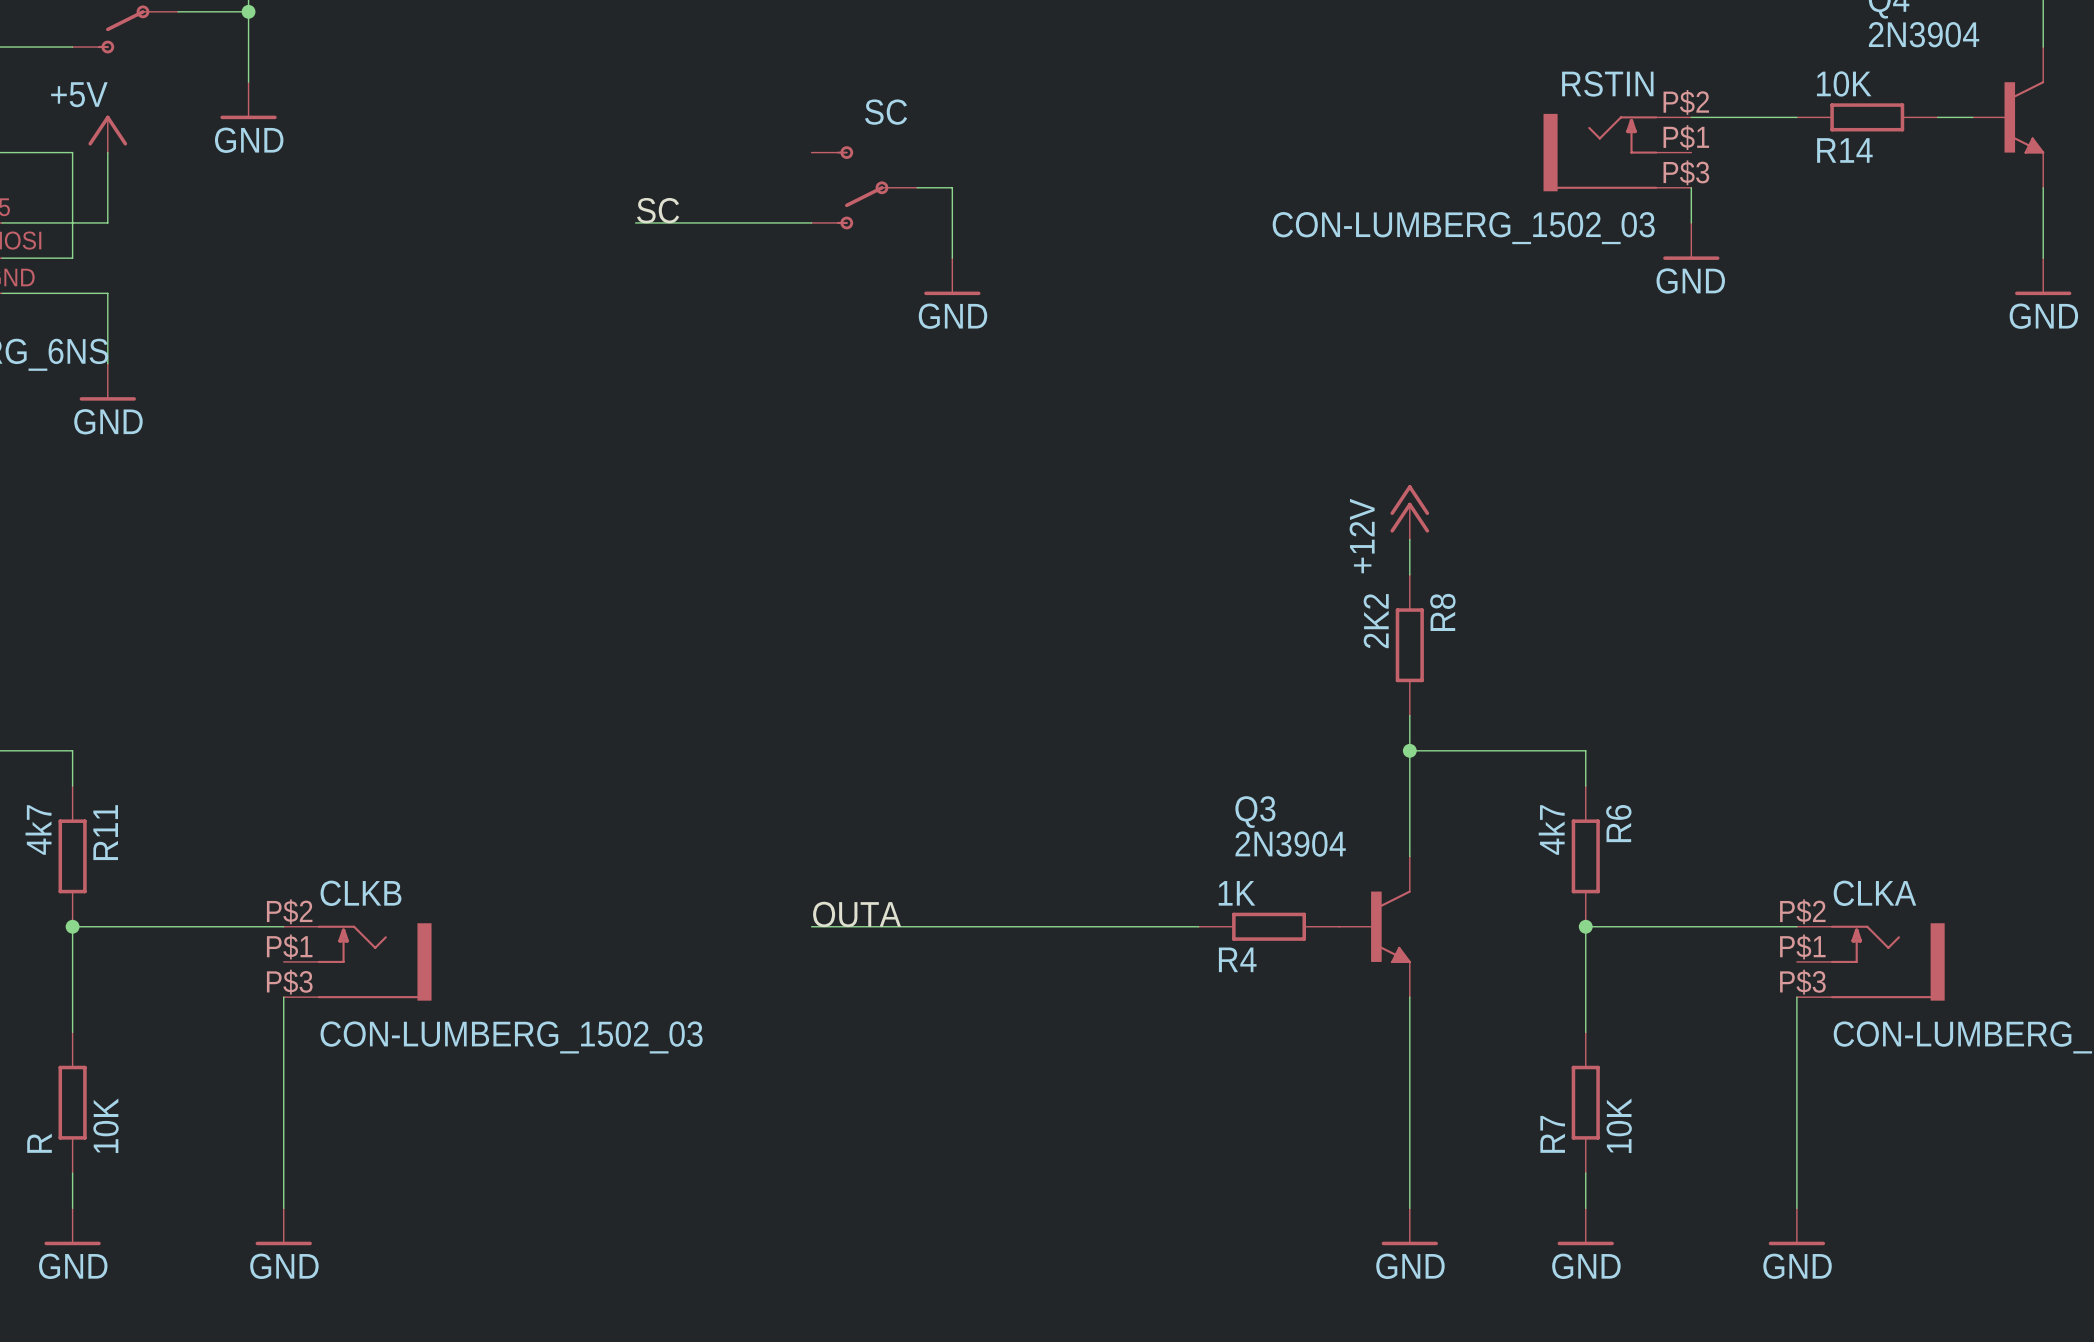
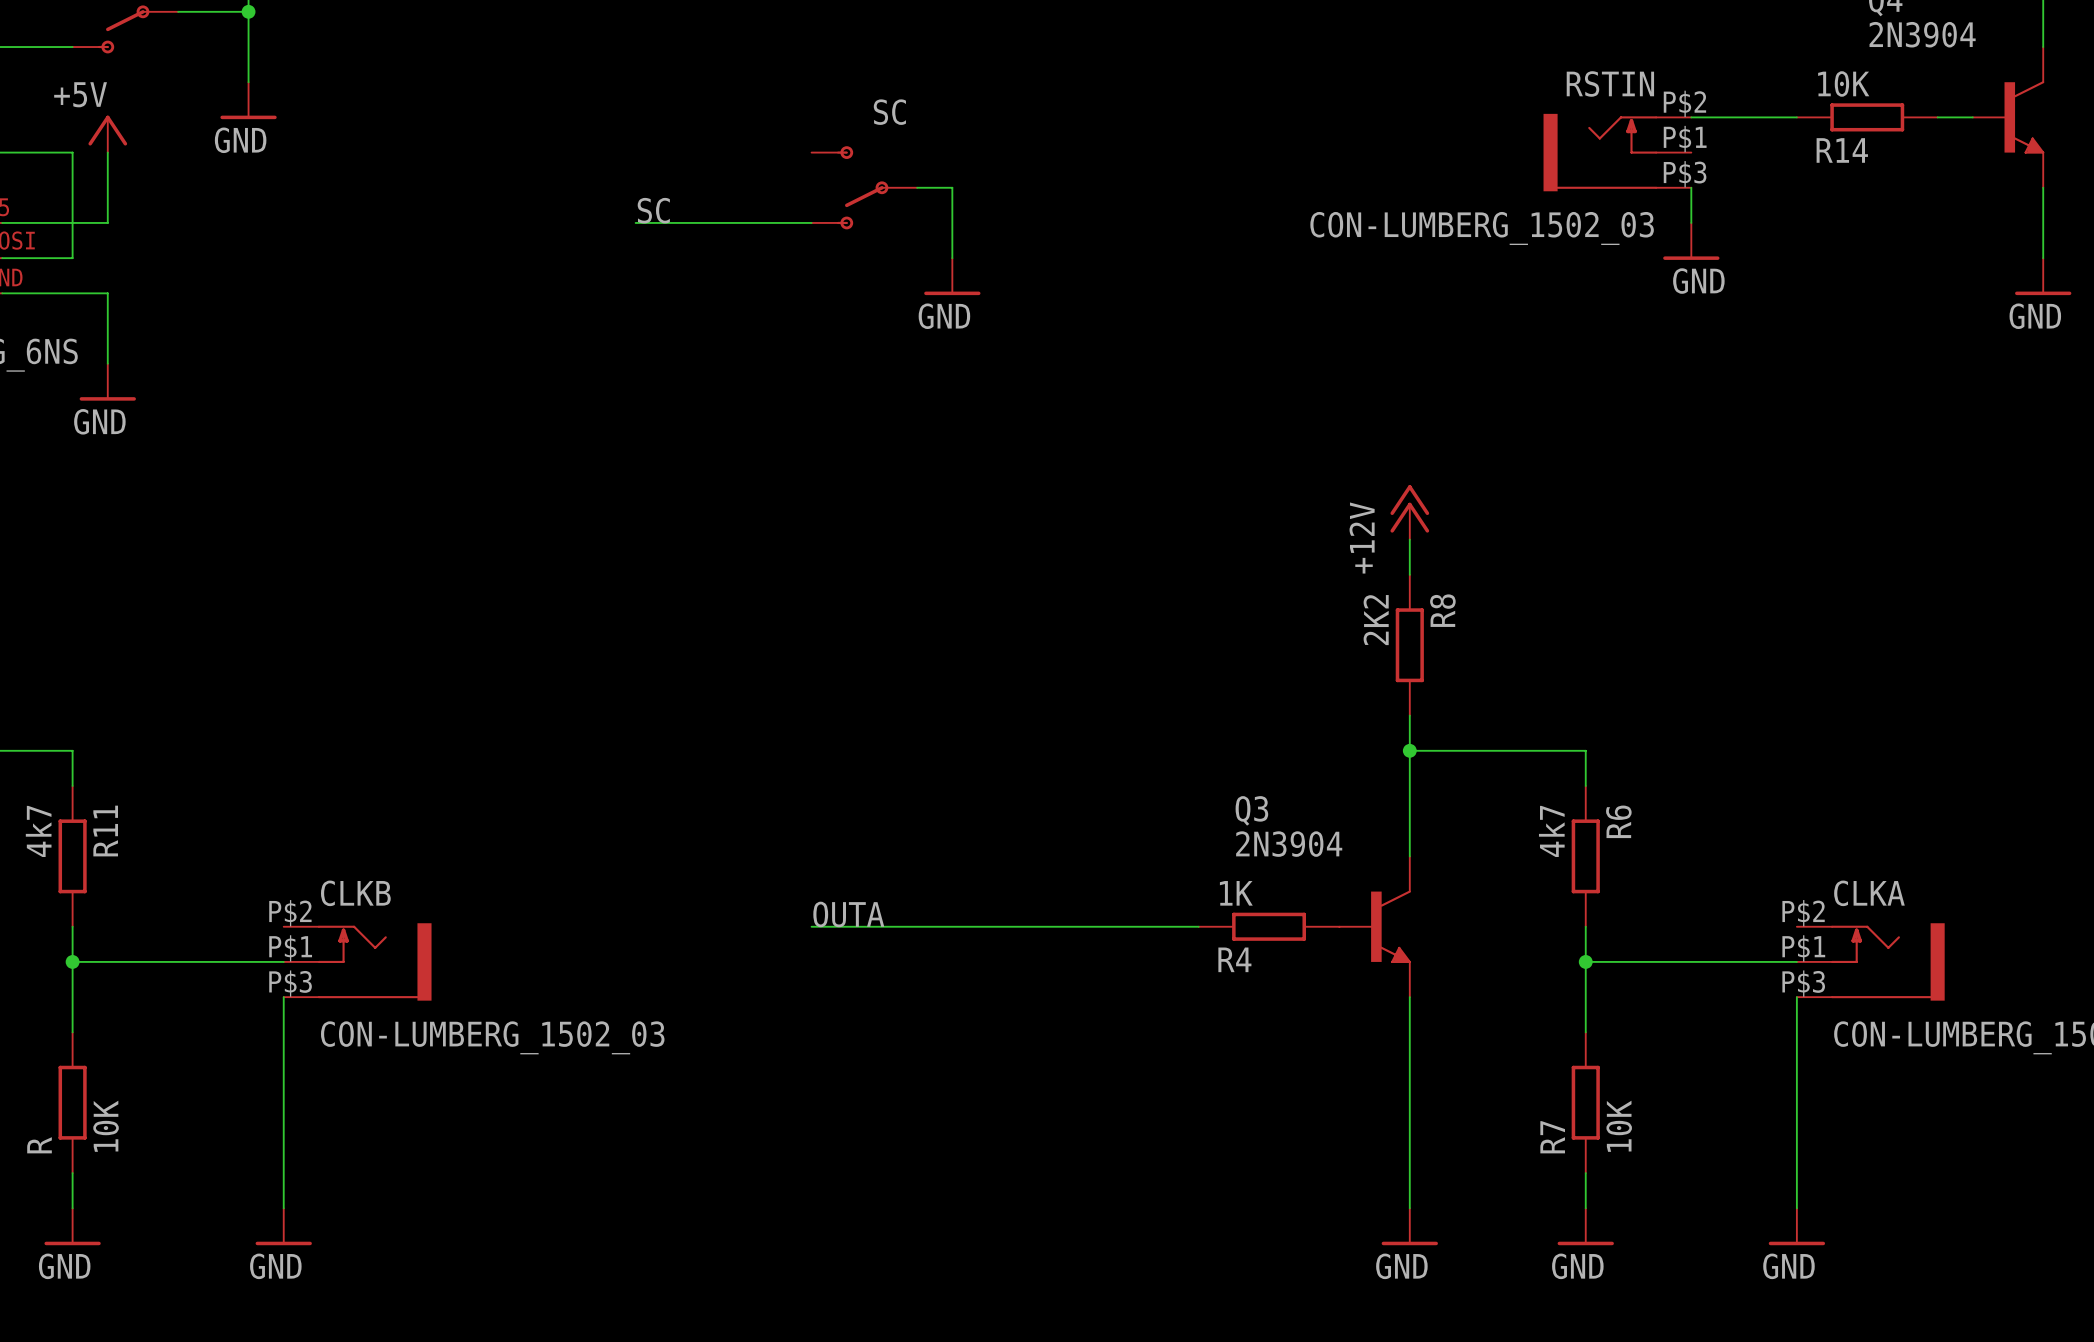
wire: (72, 926) (283, 926) -> (72, 961) (283, 961)
junction position: (72, 926) -> (72, 961)
wire: (1585, 926) (1796, 926) -> (1585, 961) (1796, 961)
junction position: (1585, 926) -> (1585, 961)

